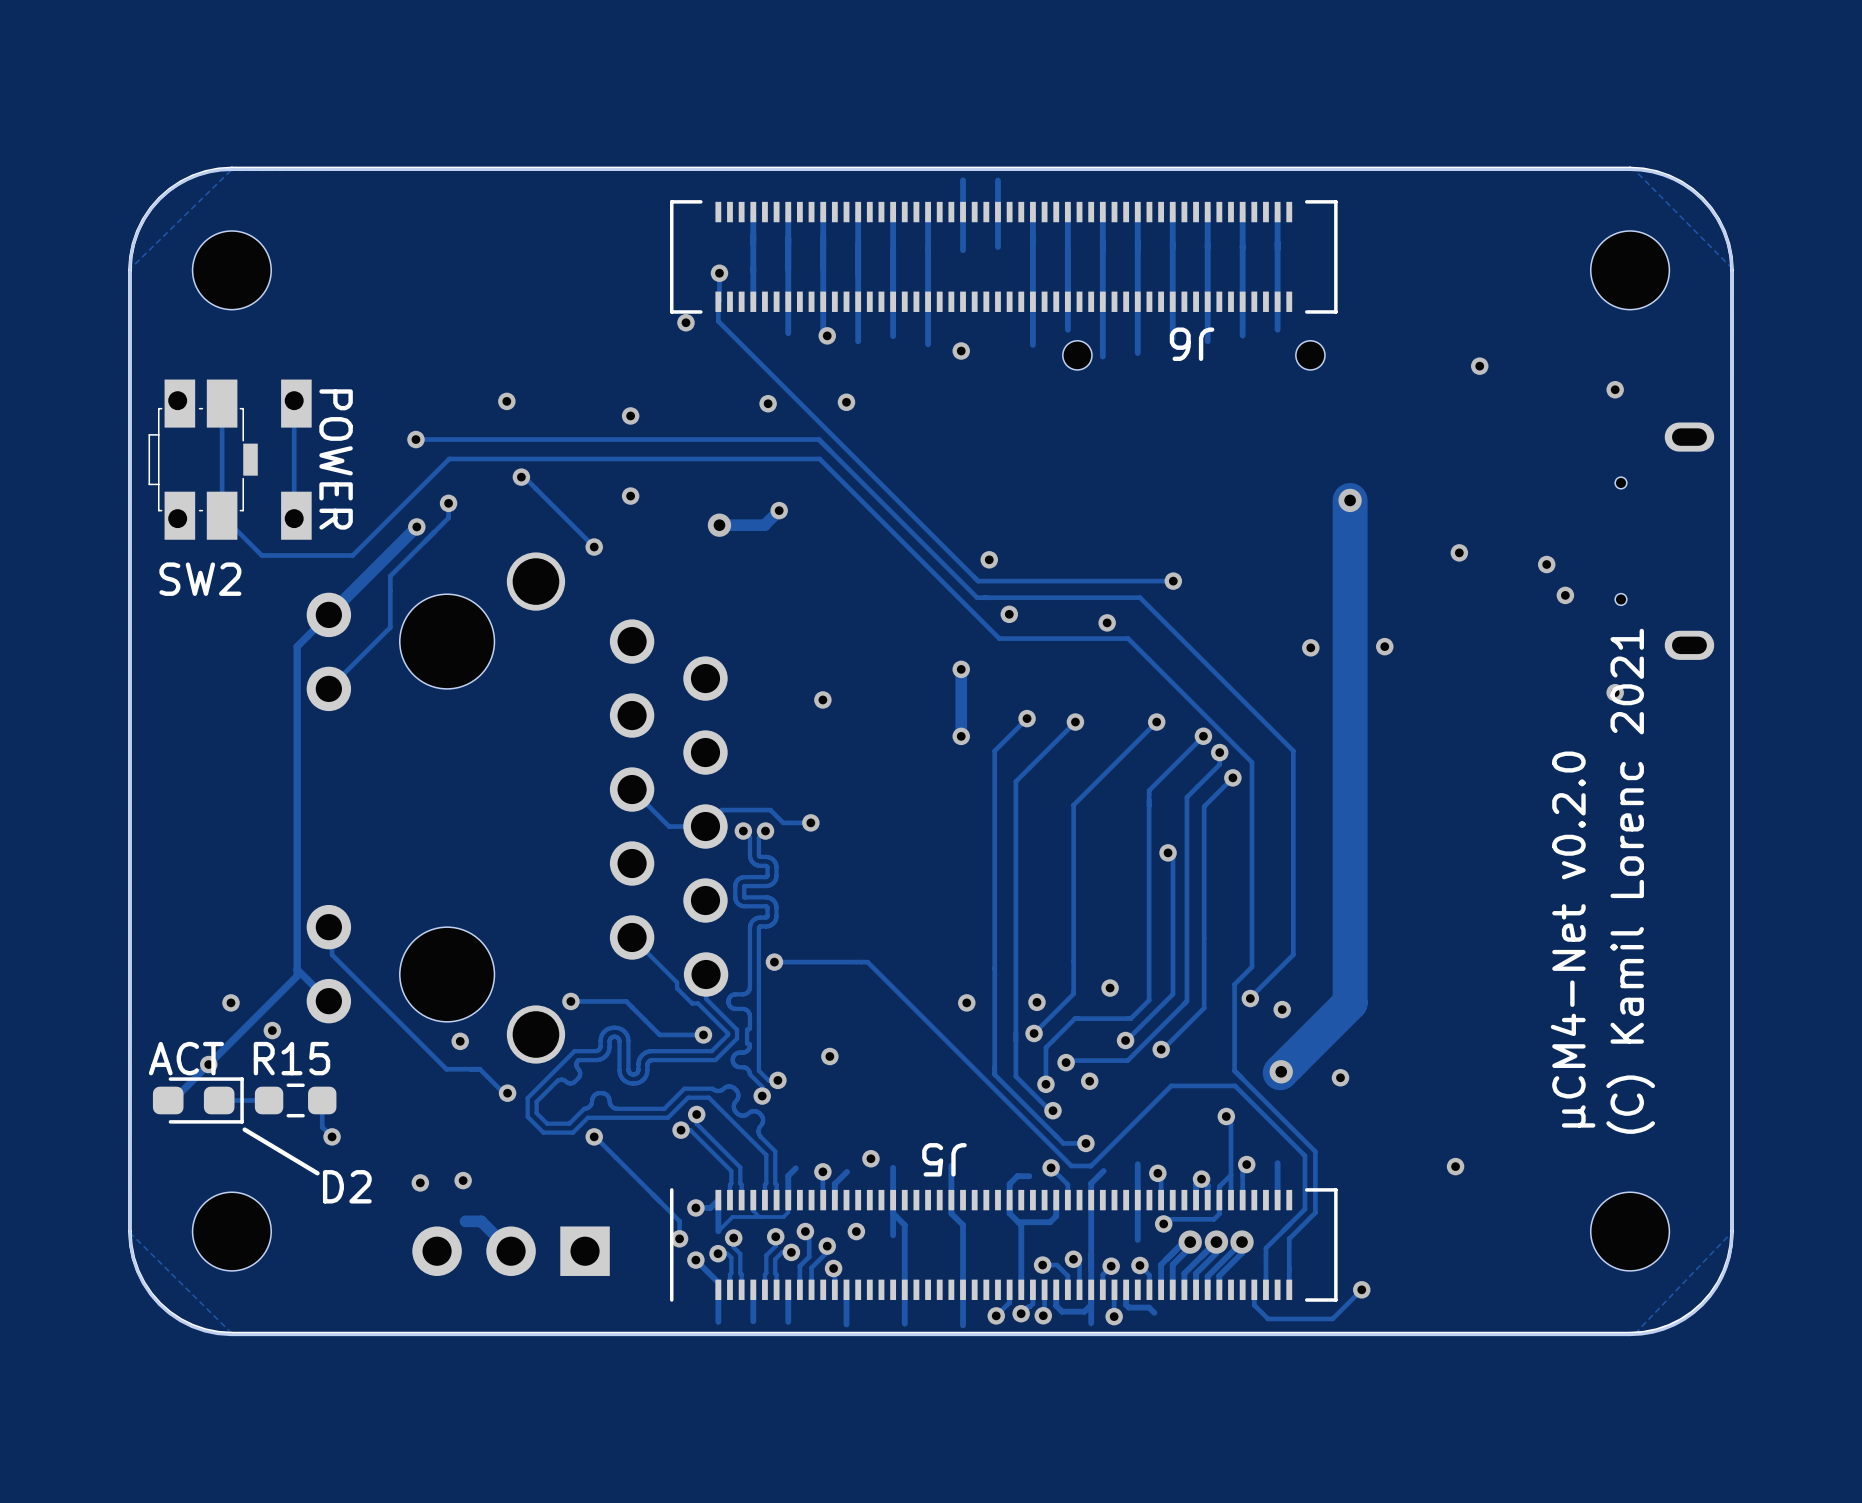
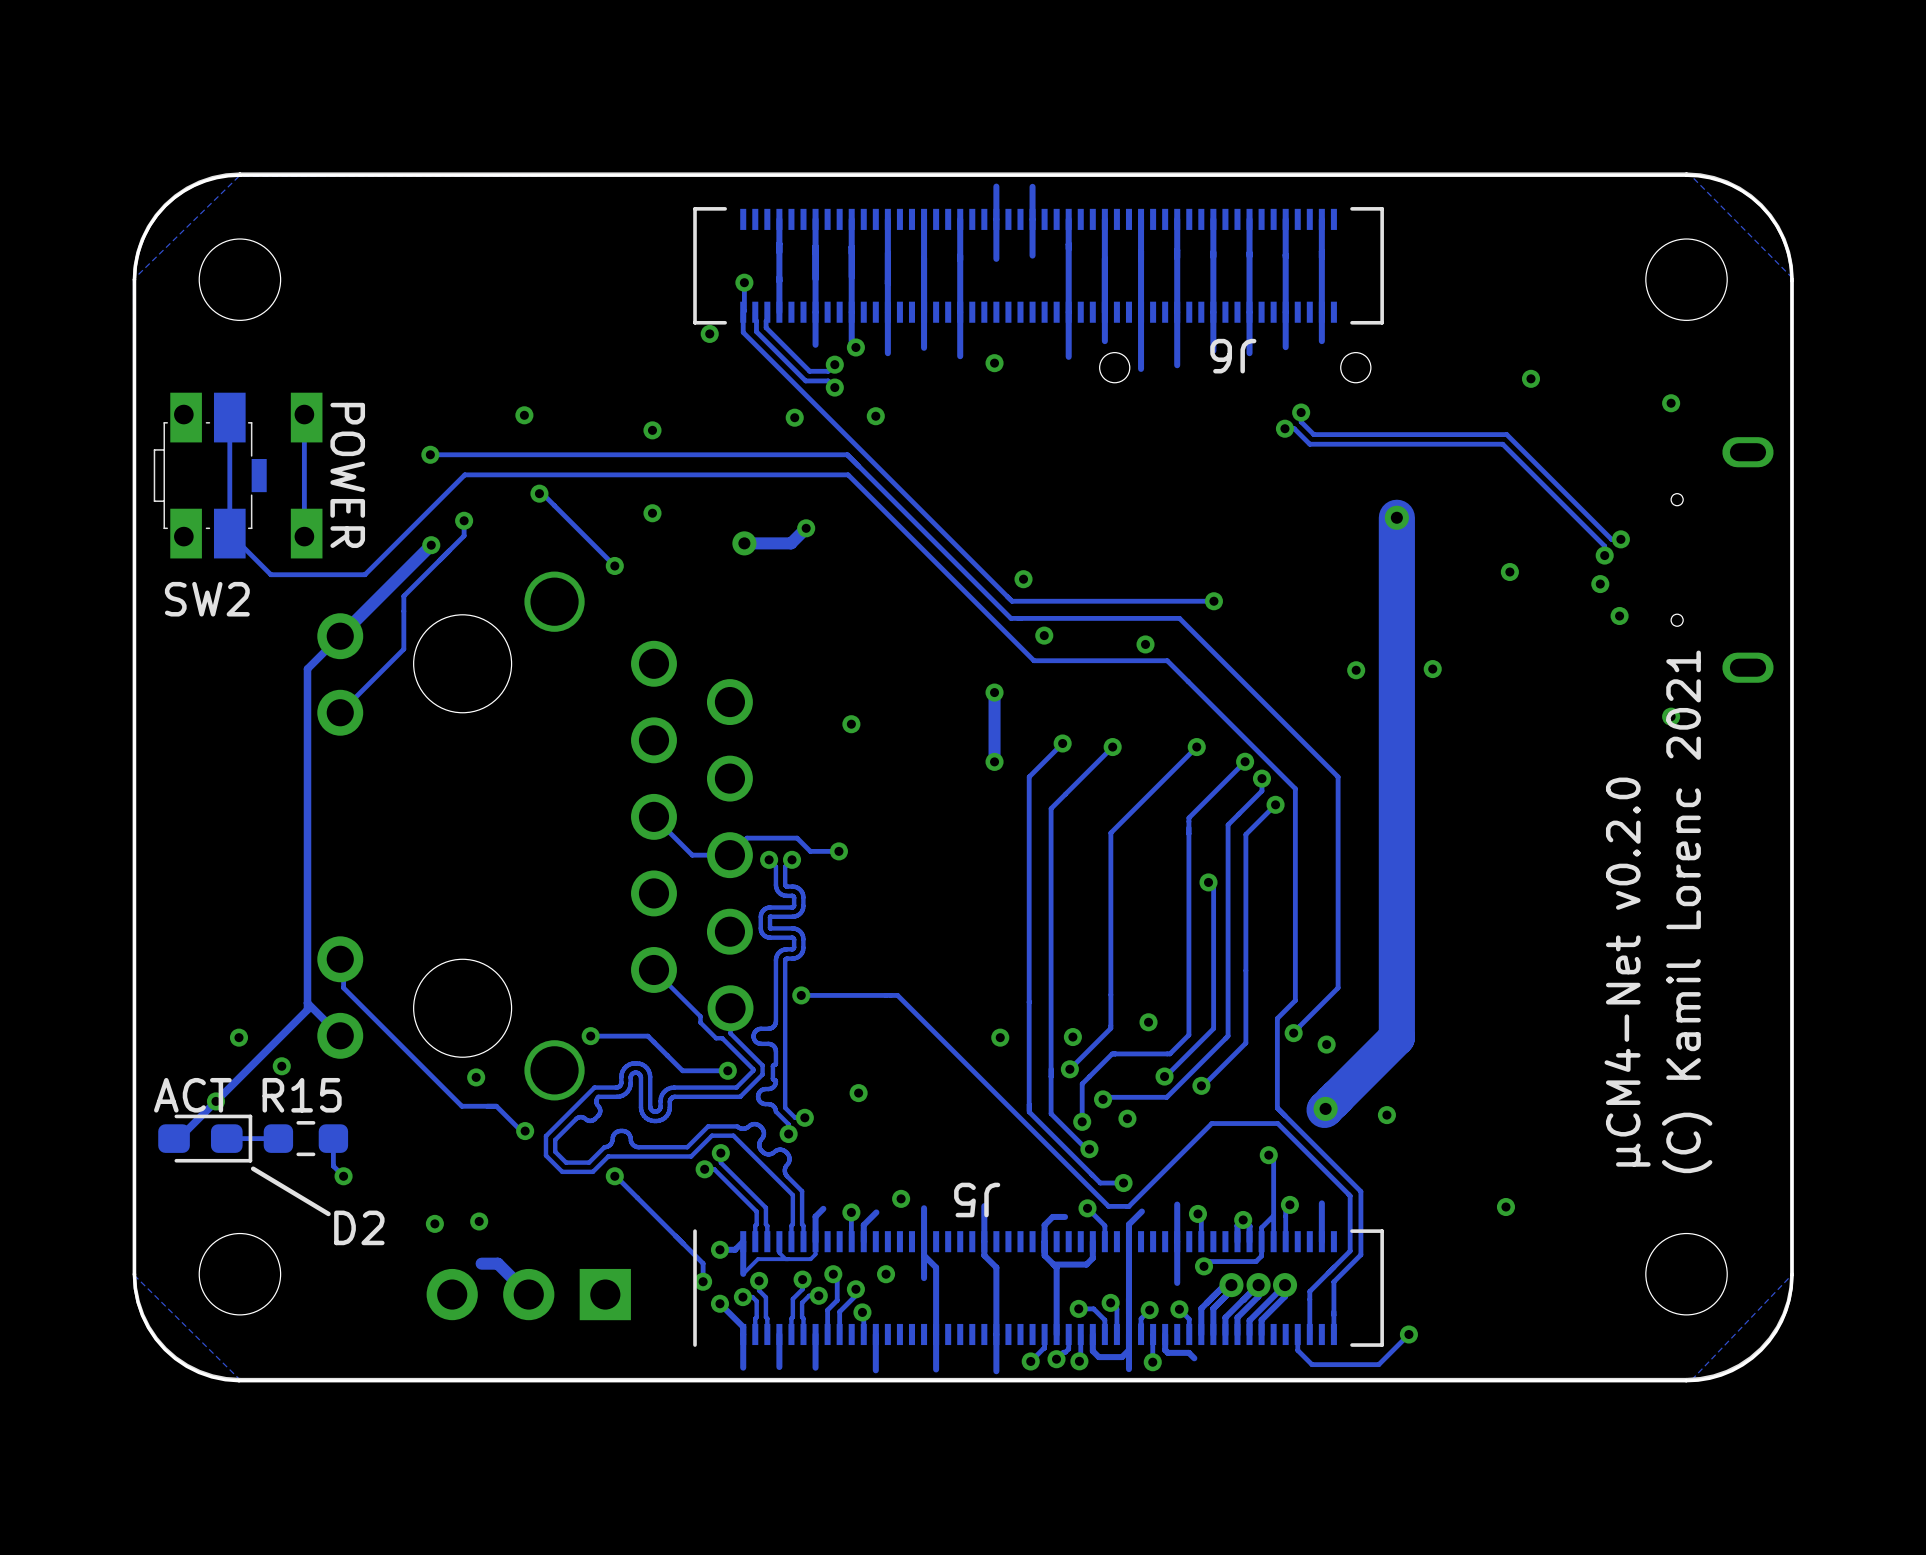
track: none -> (755, 312) (756, 331) (805, 380) (828, 380) (834, 387)
track: none -> (767, 312) (766, 327) (809, 371) (828, 371) (834, 364)
via: none -> (834, 364)
via: none -> (834, 387)
track: none -> (1301, 412) (1301, 421) (1313, 434) (1506, 434) (1611, 539) (1620, 539)
via: none -> (1301, 412)
track: none -> (1284, 428) (1294, 428) (1309, 444) (1502, 444) (1604, 546) (1604, 555)
via: none -> (1284, 428)
via: none -> (1620, 539)
via: none -> (1604, 555)

